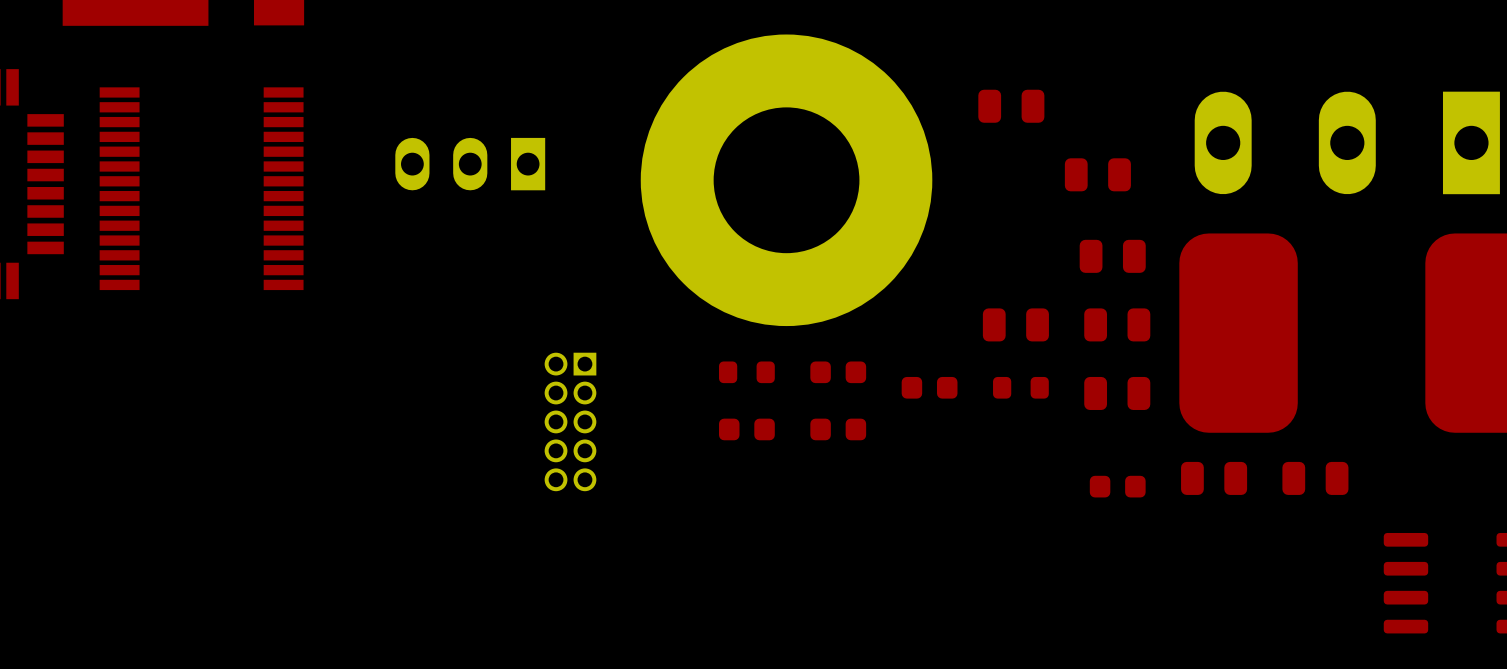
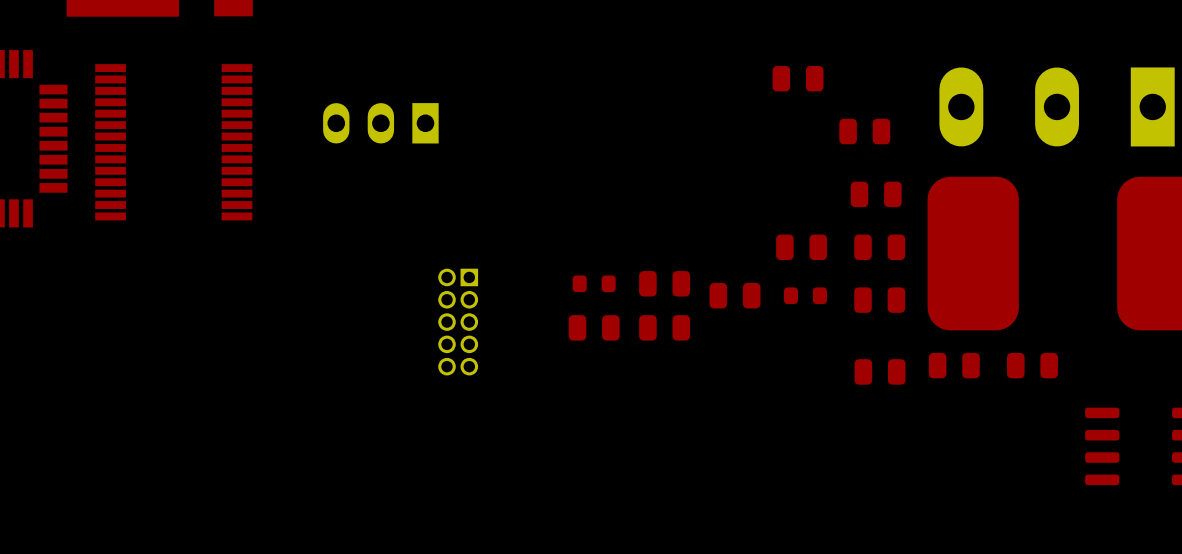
part: (786, 180) -> none
part footprint: [810, 361, 867, 384] -> [639, 271, 691, 297]
part footprint: [901, 376, 958, 399] -> [709, 282, 761, 309]
part footprint: [719, 418, 775, 441] -> [568, 315, 620, 341]
part footprint: [810, 418, 867, 441] -> [639, 315, 691, 341]
part footprint: [1089, 475, 1146, 498] -> [854, 359, 906, 385]

